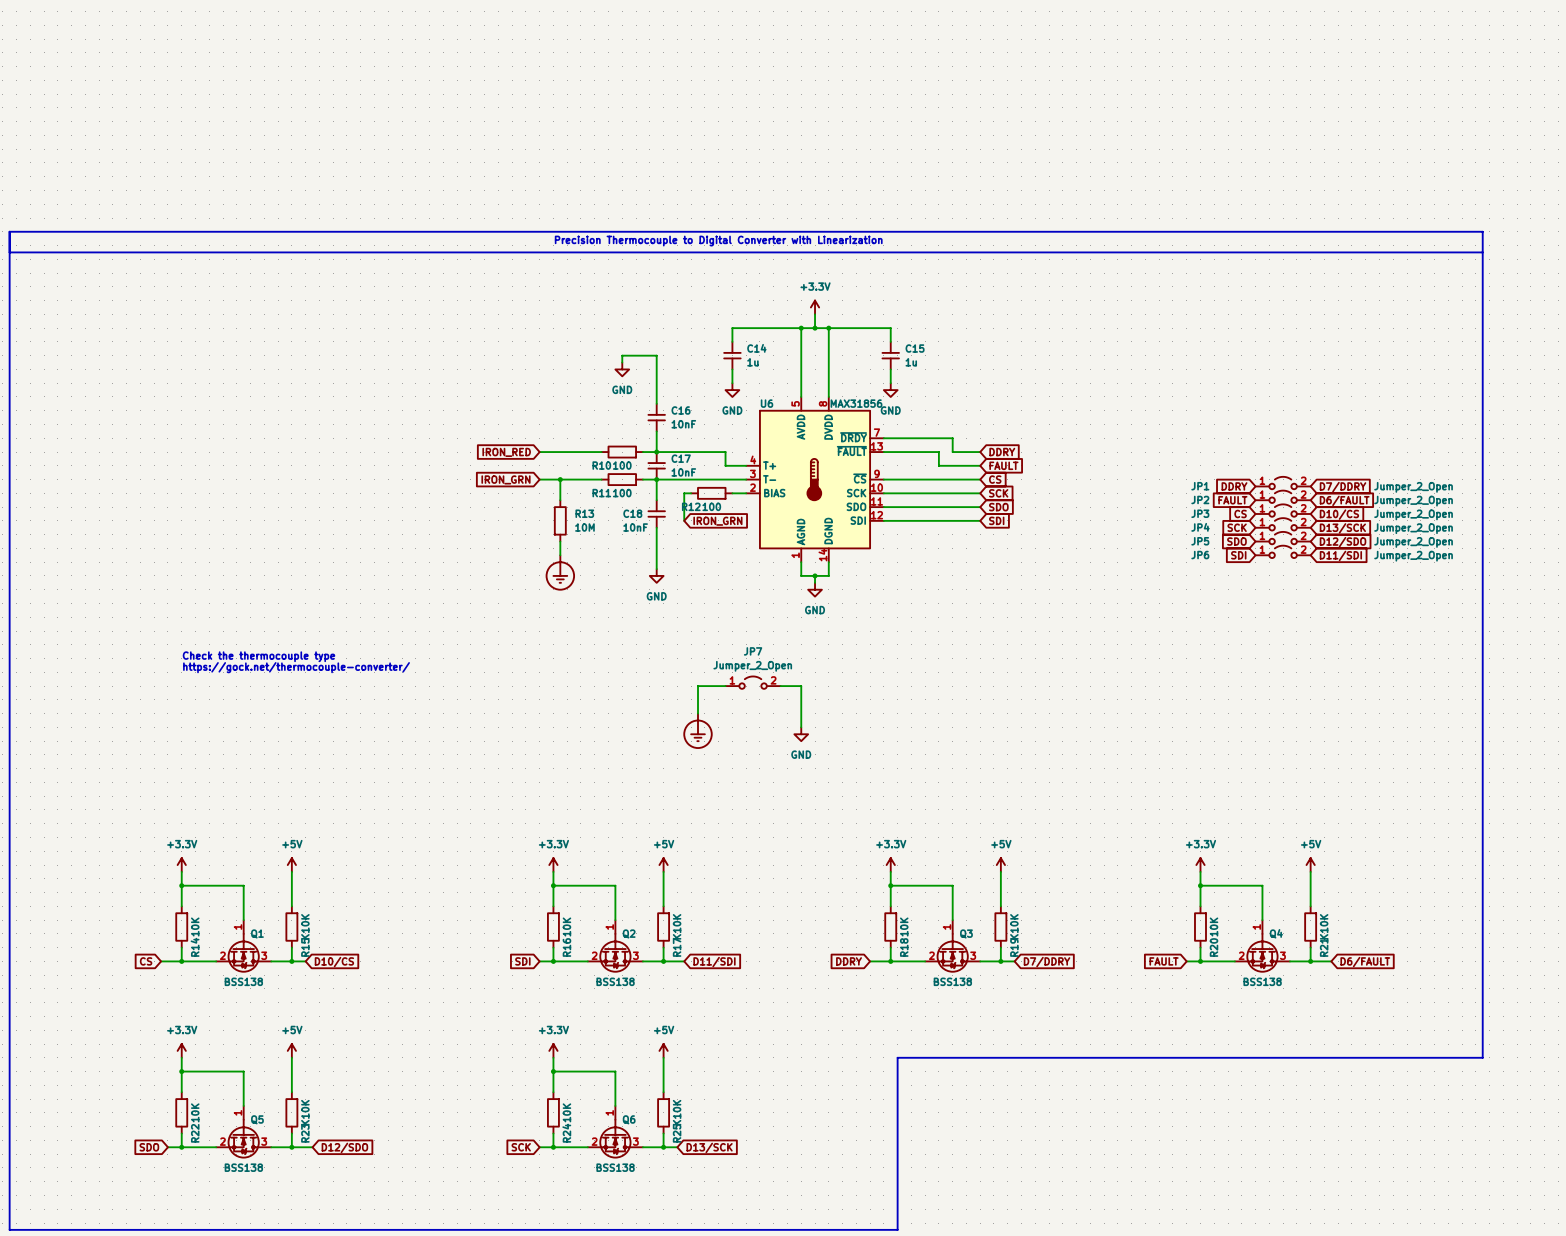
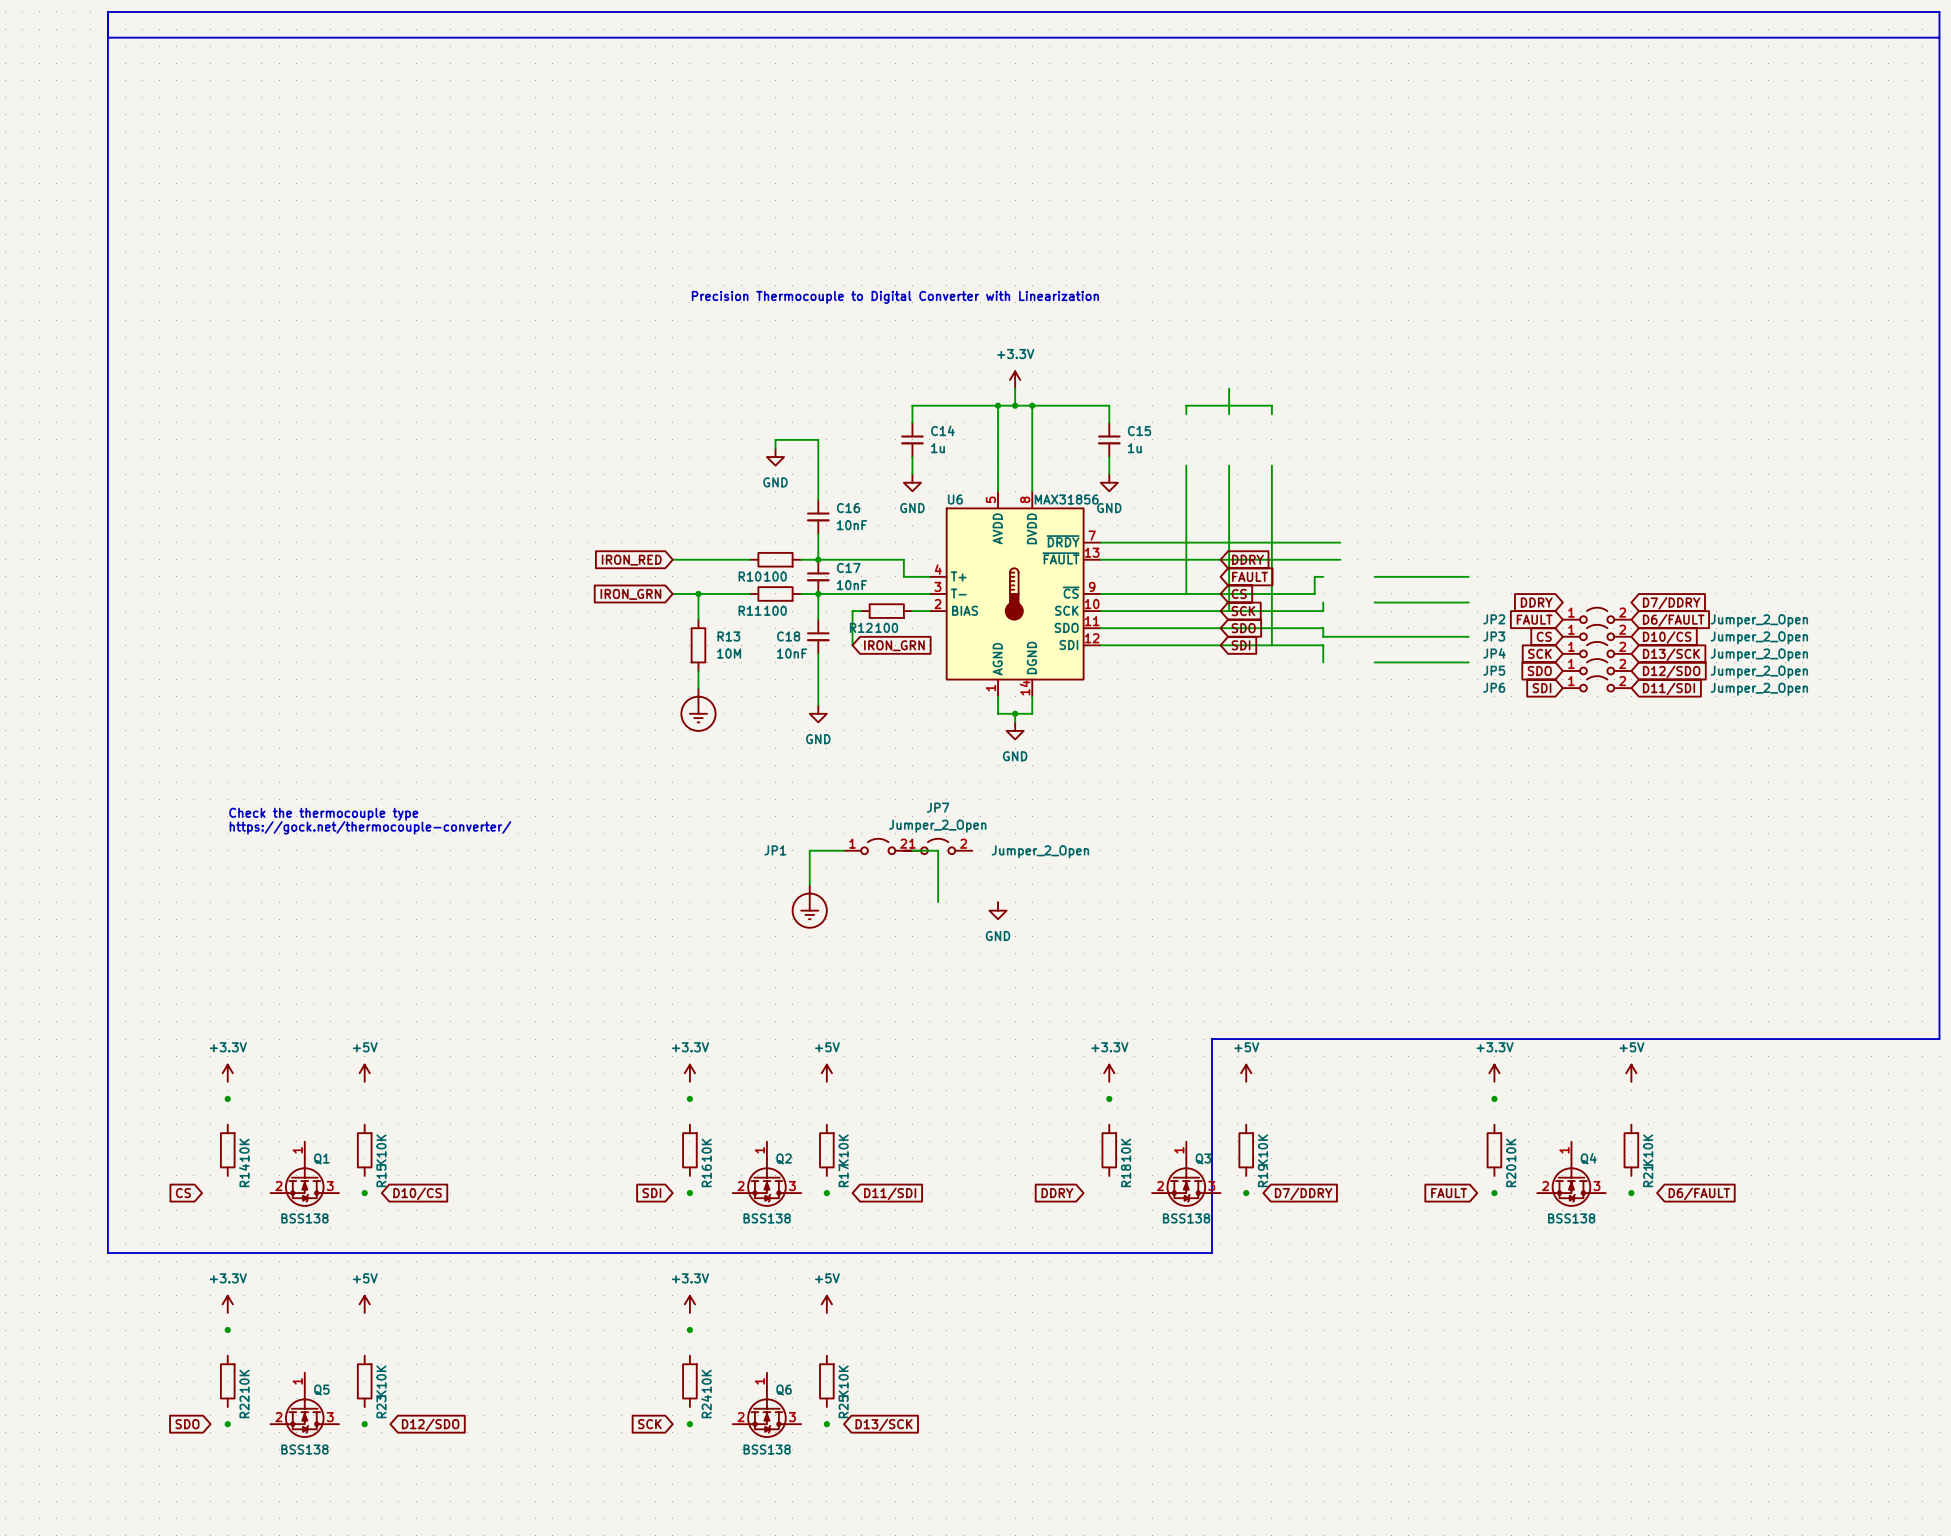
line: none -> (107, 37) (1939, 37)
line: (9, 231) (1482, 231) (1482, 1057) (897, 1057) (897, 1229) (9, 1229) (9, 231) -> (107, 11) (1939, 11) (1939, 1039) (1211, 1039) (1211, 1252) (107, 1252) (107, 11)
line: (9, 252) (1482, 252) -> none
wire: none -> (1229, 388) (1229, 414)
wire: none -> (1186, 414) (1186, 405) (1271, 405) (1271, 414)
wire: none -> (1186, 465) (1186, 542) (1340, 542)
wire: none -> (1229, 465) (1229, 611)
wire: none -> (1271, 465) (1271, 645)
wire: (938, 452) (938, 465) (980, 465) -> (1169, 559) (1186, 559) (1186, 593)
wire: none -> (1220, 559) (1340, 559)
wire: none -> (1323, 576) (1314, 576) (1314, 593) (1220, 593)
wire: none -> (1374, 576) (1468, 576)
JP1 position: (1283, 483) -> (878, 846)
wire: none -> (1323, 602) (1323, 611) (1220, 611)
wire: none -> (1374, 602) (1468, 602)
wire: none -> (1220, 628) (1323, 628) (1323, 636) (1468, 636)
wire: none -> (1220, 645) (1323, 645) (1323, 662)
wire: none -> (1374, 662) (1468, 662)
wire: (725, 686) (698, 686) (698, 713) -> (843, 850) (809, 850) (809, 884)
wire: (780, 686) (801, 686) (801, 727) -> (912, 850) (938, 850) (938, 902)
power symbol position: (698, 730) -> (809, 906)
wire: (181, 871) (181, 906) -> none
wire: (291, 871) (291, 906) -> none
wire: (553, 871) (553, 906) -> none
wire: (663, 871) (663, 906) -> none
wire: (890, 871) (890, 906) -> none
wire: (1000, 871) (1000, 906) -> none
wire: (1200, 871) (1200, 906) -> none
wire: (1310, 871) (1310, 906) -> none
wire: (181, 885) (243, 885) (243, 920) -> none
wire: (553, 885) (615, 885) (615, 920) -> none
wire: (890, 885) (952, 885) (952, 920) -> none
wire: (1200, 885) (1262, 885) (1262, 920) -> none
wire: (181, 947) (181, 961) -> none
wire: (291, 947) (291, 961) -> none
wire: (553, 947) (553, 961) -> none
wire: (663, 947) (663, 961) -> none
wire: (890, 947) (890, 961) -> none
wire: (1000, 947) (1000, 961) -> none
wire: (1200, 947) (1200, 961) -> none
wire: (1310, 947) (1310, 961) -> none
wire: (161, 961) (216, 961) -> none
junction: (181, 961) -> none
wire: (271, 961) (305, 961) -> none
wire: (539, 961) (587, 961) -> none
wire: (642, 961) (684, 961) -> none
wire: (870, 961) (925, 961) -> none
junction: (890, 961) -> none
wire: (980, 961) (1014, 961) -> none
wire: (1186, 961) (1234, 961) -> none
wire: (1289, 961) (1331, 961) -> none
wire: (181, 1057) (181, 1092) -> none
wire: (291, 1057) (291, 1092) -> none
wire: (553, 1057) (553, 1092) -> none
wire: (663, 1057) (663, 1092) -> none
wire: (181, 1071) (243, 1071) (243, 1105) -> none
wire: (553, 1071) (615, 1071) (615, 1105) -> none
wire: (181, 1133) (181, 1147) -> none
wire: (291, 1133) (291, 1147) -> none
wire: (553, 1133) (553, 1147) -> none
wire: (663, 1133) (663, 1147) -> none
wire: (167, 1147) (216, 1147) -> none
wire: (271, 1147) (312, 1147) -> none
wire: (539, 1147) (587, 1147) -> none
wire: (642, 1147) (677, 1147) -> none

